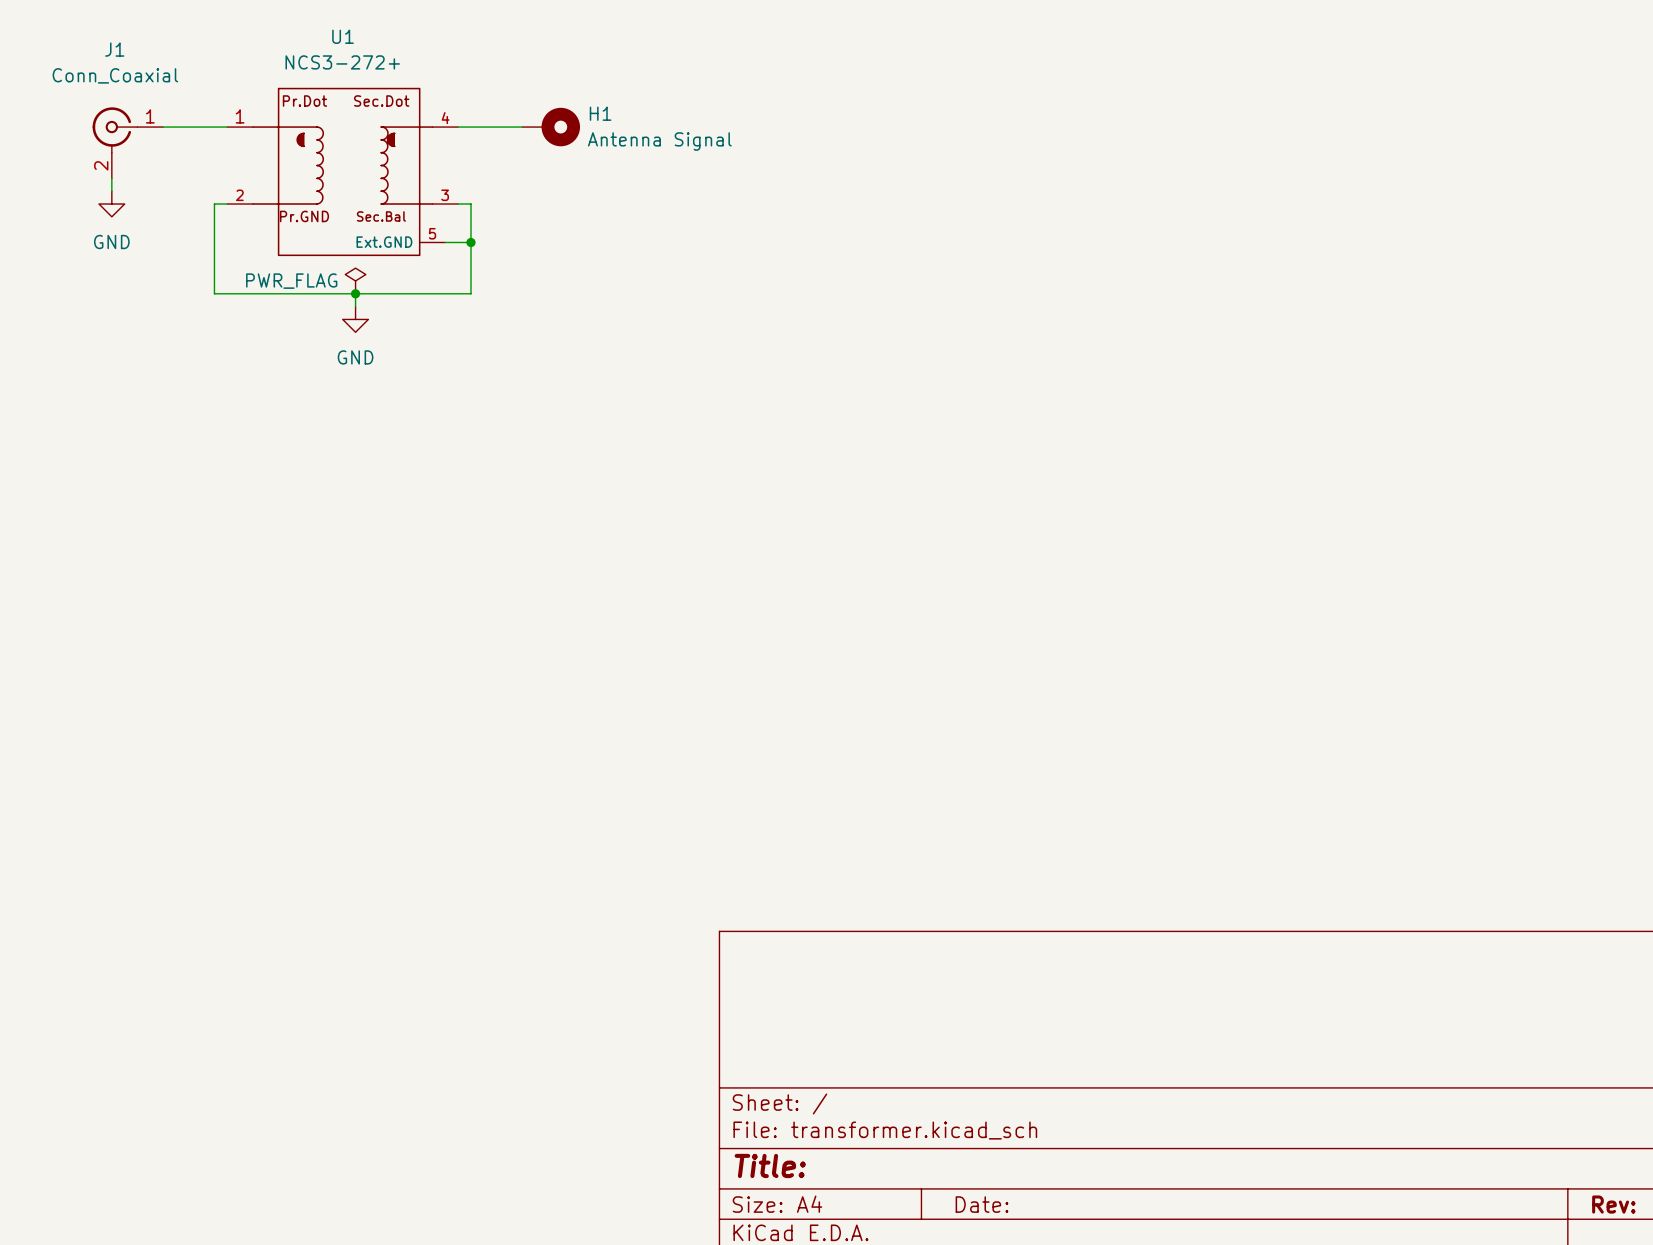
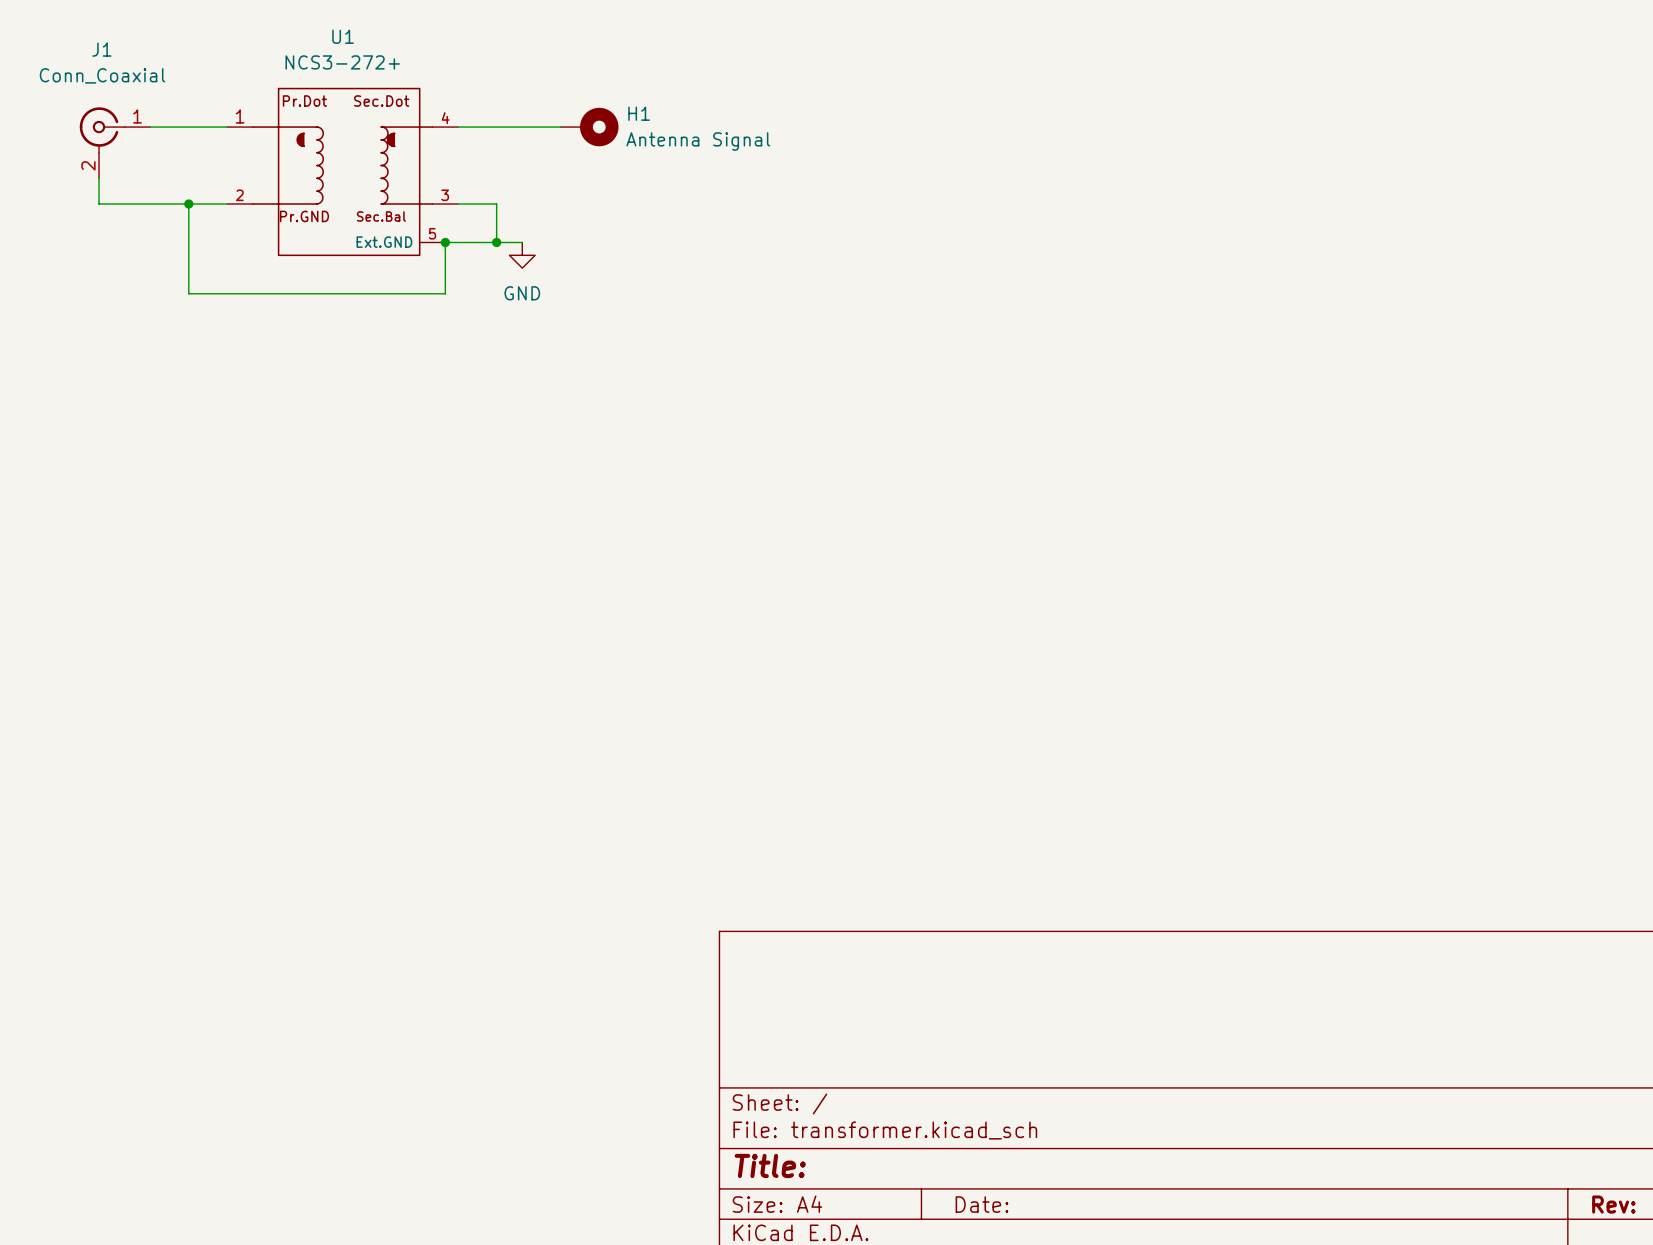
H1 position: (551, 127) -> (589, 127)
J1 position: (127, 142) -> (115, 142)
wire: none -> (99, 178) (99, 204) (214, 204)
wire: (111, 178) (111, 191) -> none
power symbol: GND (111, 204) -> none
junction: none -> (188, 204)
wire: (214, 204) (214, 293) -> (188, 204) (188, 293) (214, 293)
wire: (470, 204) (470, 293) (445, 293) -> (445, 242) (445, 293)
wire: none -> (470, 204) (496, 204) (496, 242)
junction: none -> (445, 242)
wire: none -> (470, 242) (522, 242)
junction: (470, 242) -> none
junction: none -> (496, 242)
power symbol: PWR_FLAG (355, 280) -> none
wire: (355, 293) (355, 306) -> none
junction: (355, 293) -> none
power symbol position: GND (355, 319) -> GND (522, 255)

